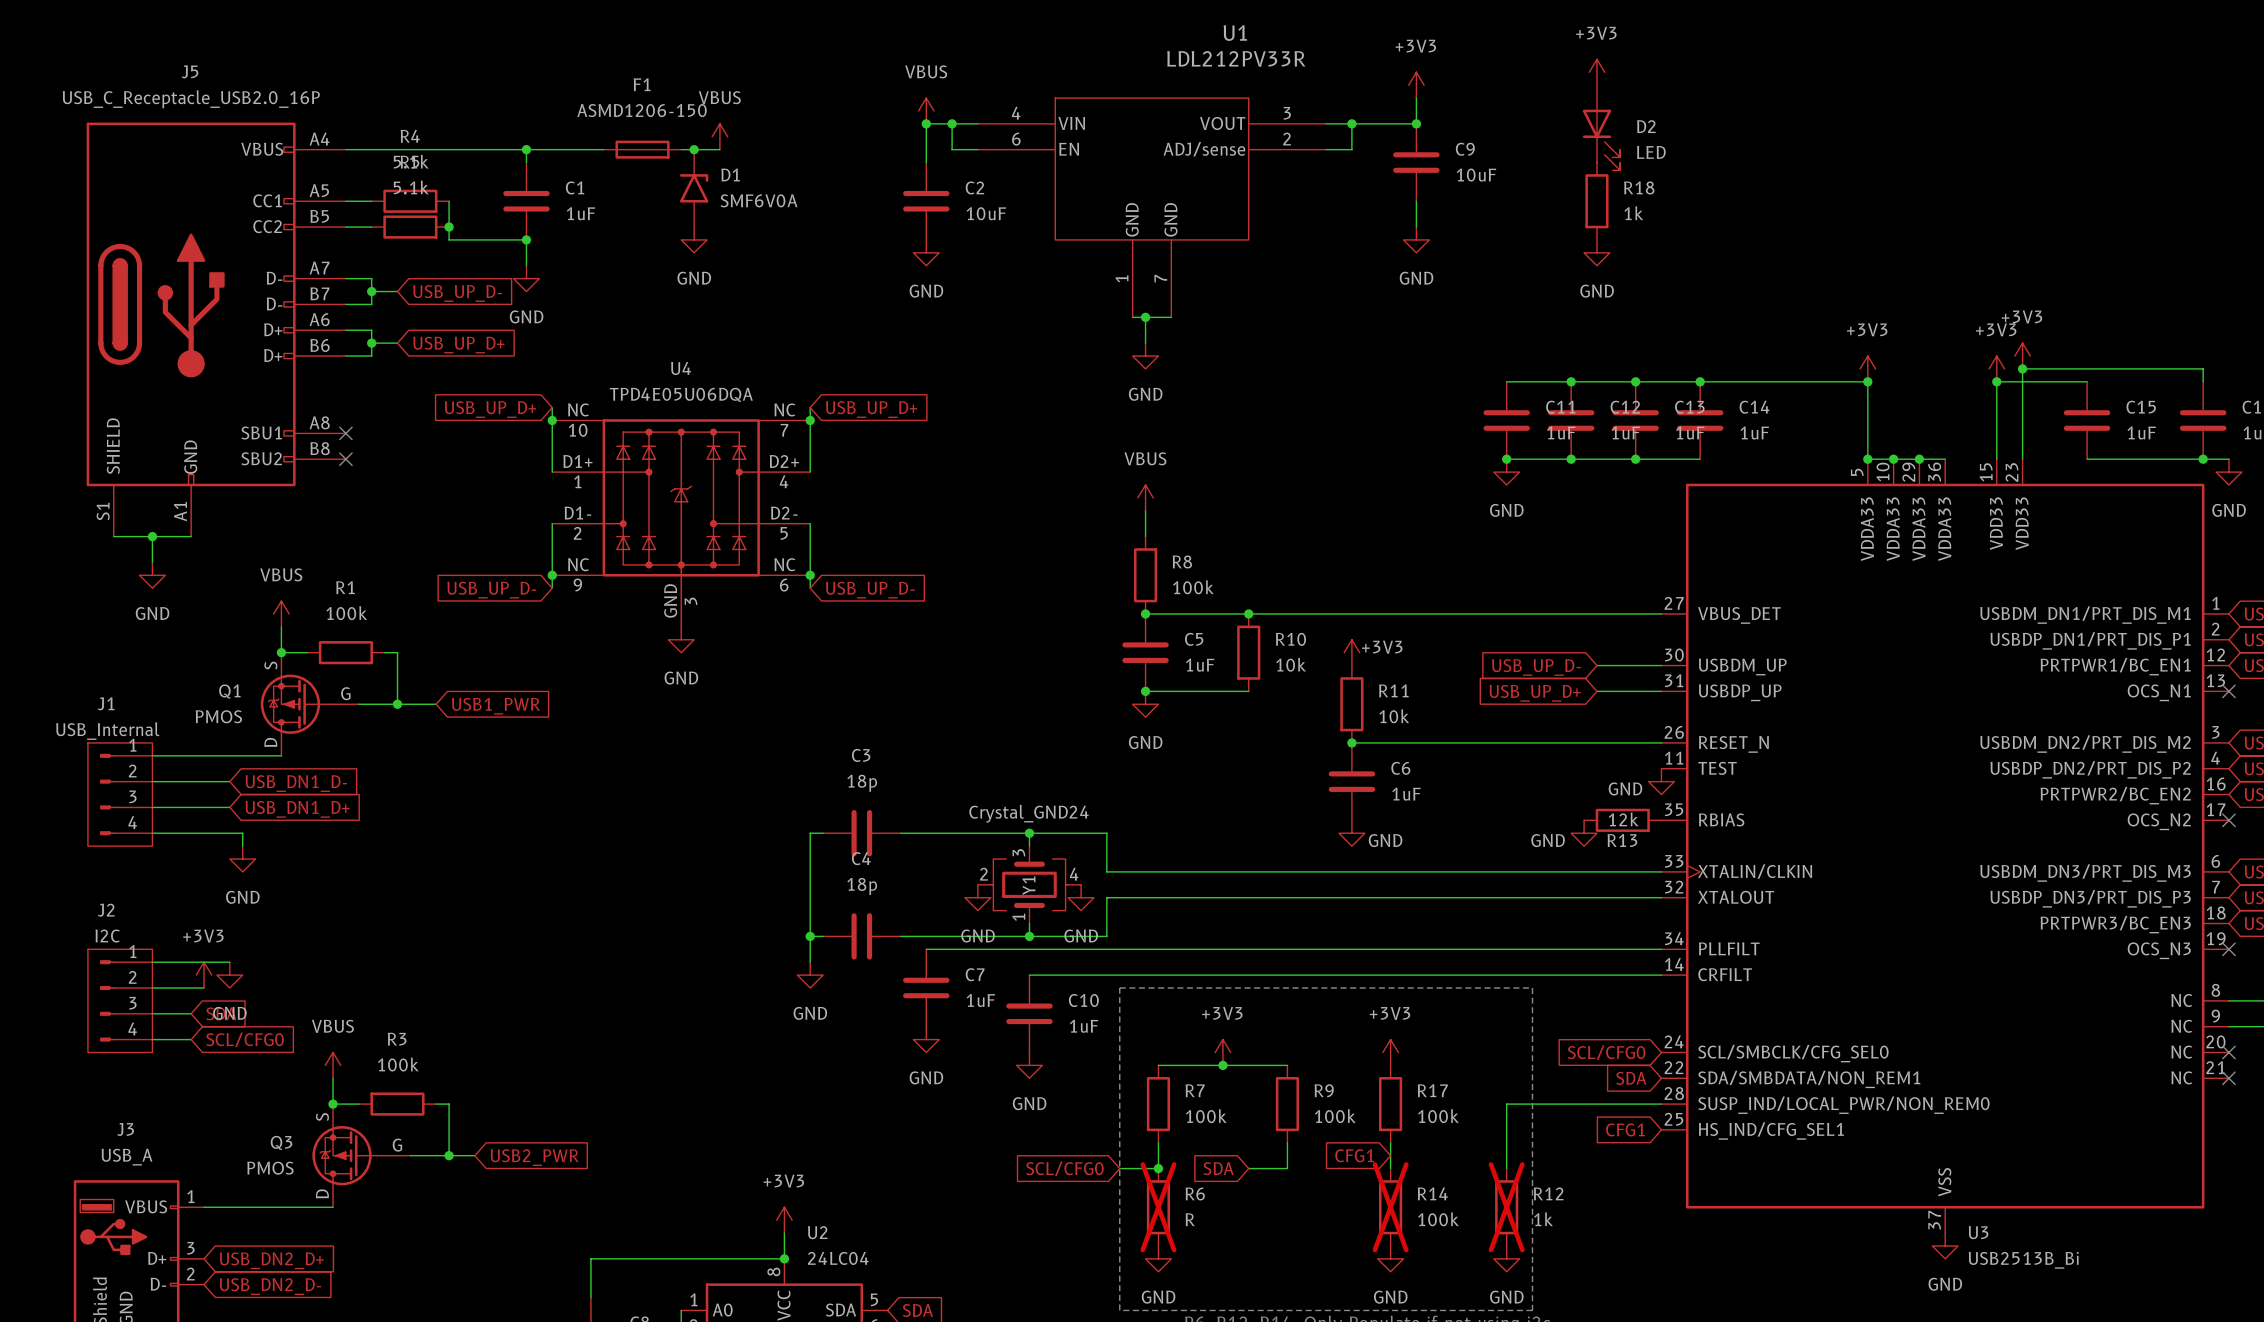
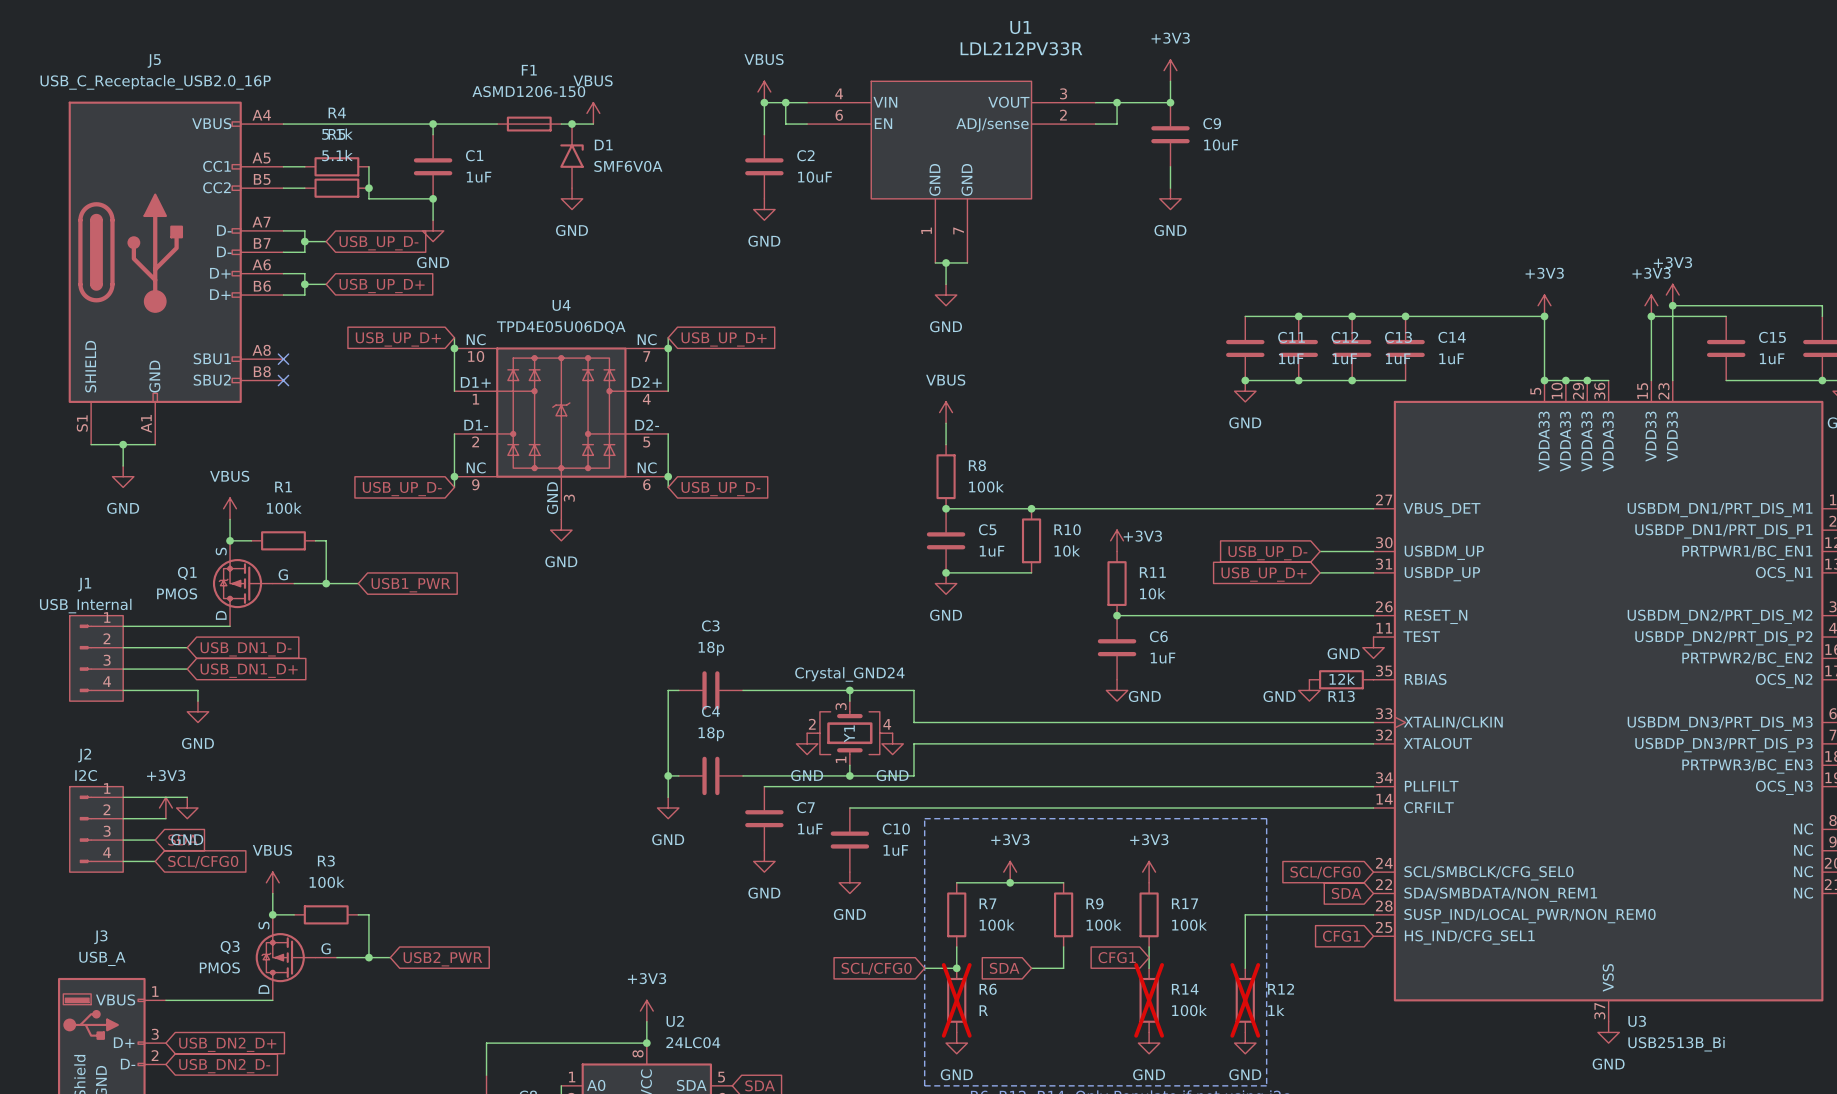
power symbol: +3V3 (1596, 72) -> none
D2: LED (1601, 127) -> none
R18: 1k (1596, 201) -> none
power symbol: GND (1596, 252) -> none

